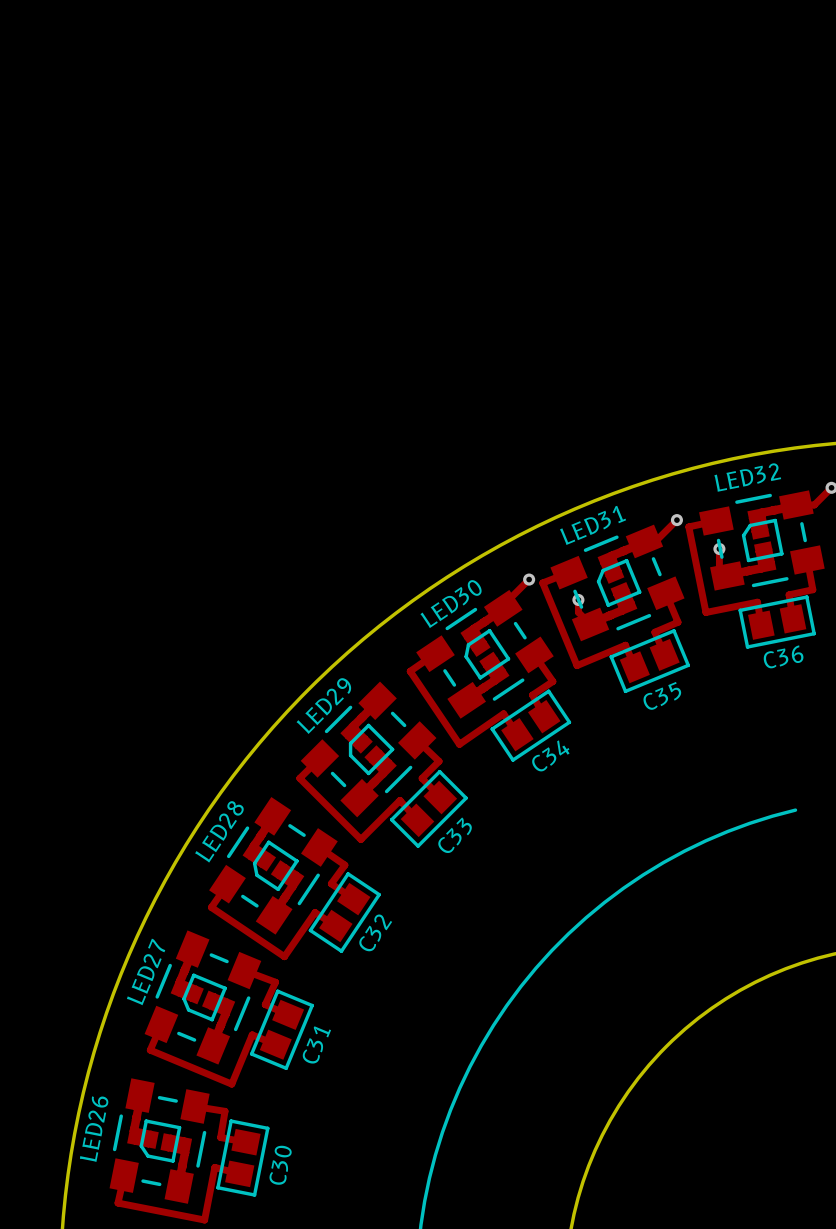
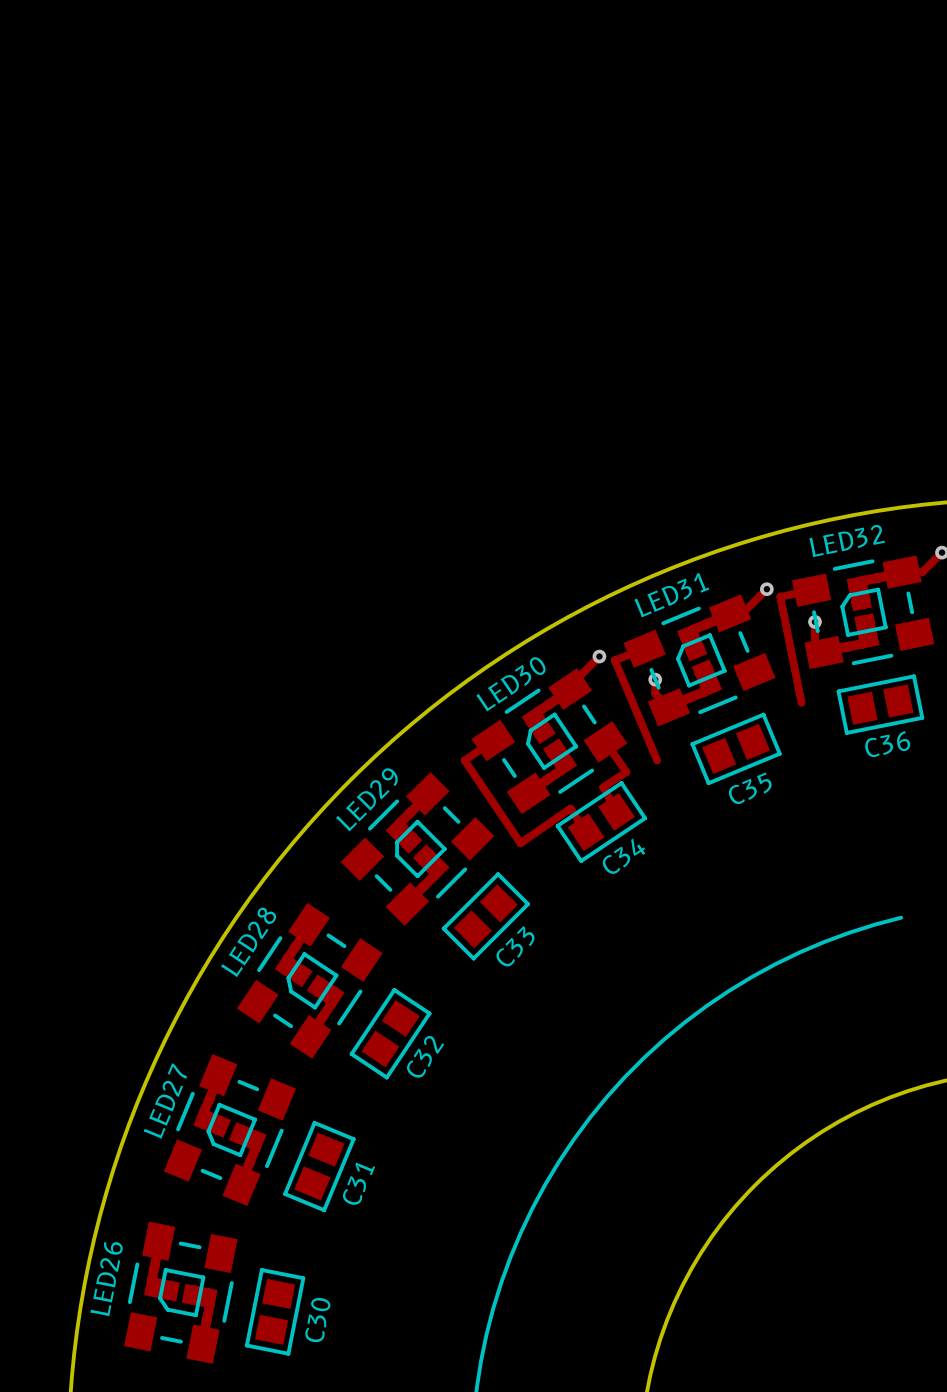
track: (807, 559) (812, 589) (789, 594) (793, 618) -> none
track: (542, 582) (577, 665) (625, 645) (634, 667) -> (614, 660) (657, 760)
track: (665, 593) (678, 622) (654, 632) (664, 654) -> none
track: (705, 612) (757, 602) (761, 625) -> (799, 693) (801, 702)
track: (417, 740) (439, 761) (422, 778) (440, 797) -> none
track: (319, 758) (299, 778) (360, 839) (400, 800) (417, 820) -> none
track: (319, 847) (344, 865) (331, 883) (353, 899) -> none
track: (227, 884) (211, 907) (284, 956) (315, 912) (335, 925) -> none
track: (244, 970) (275, 982) (265, 1004) (288, 1014) -> none
track: (161, 1024) (150, 1050) (231, 1084) (252, 1034) (275, 1044) -> none
track: (195, 1106) (225, 1111) (220, 1137) (246, 1142) -> none
track: (239, 1173) (214, 1167) (204, 1220) (117, 1203) (124, 1175) -> none

